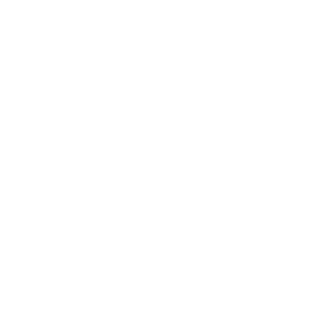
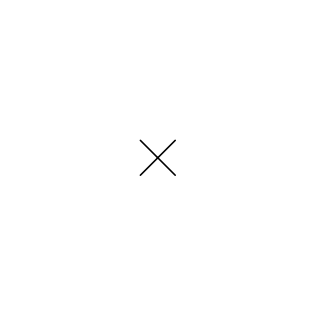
no-connect mark: none -> (157, 157)

